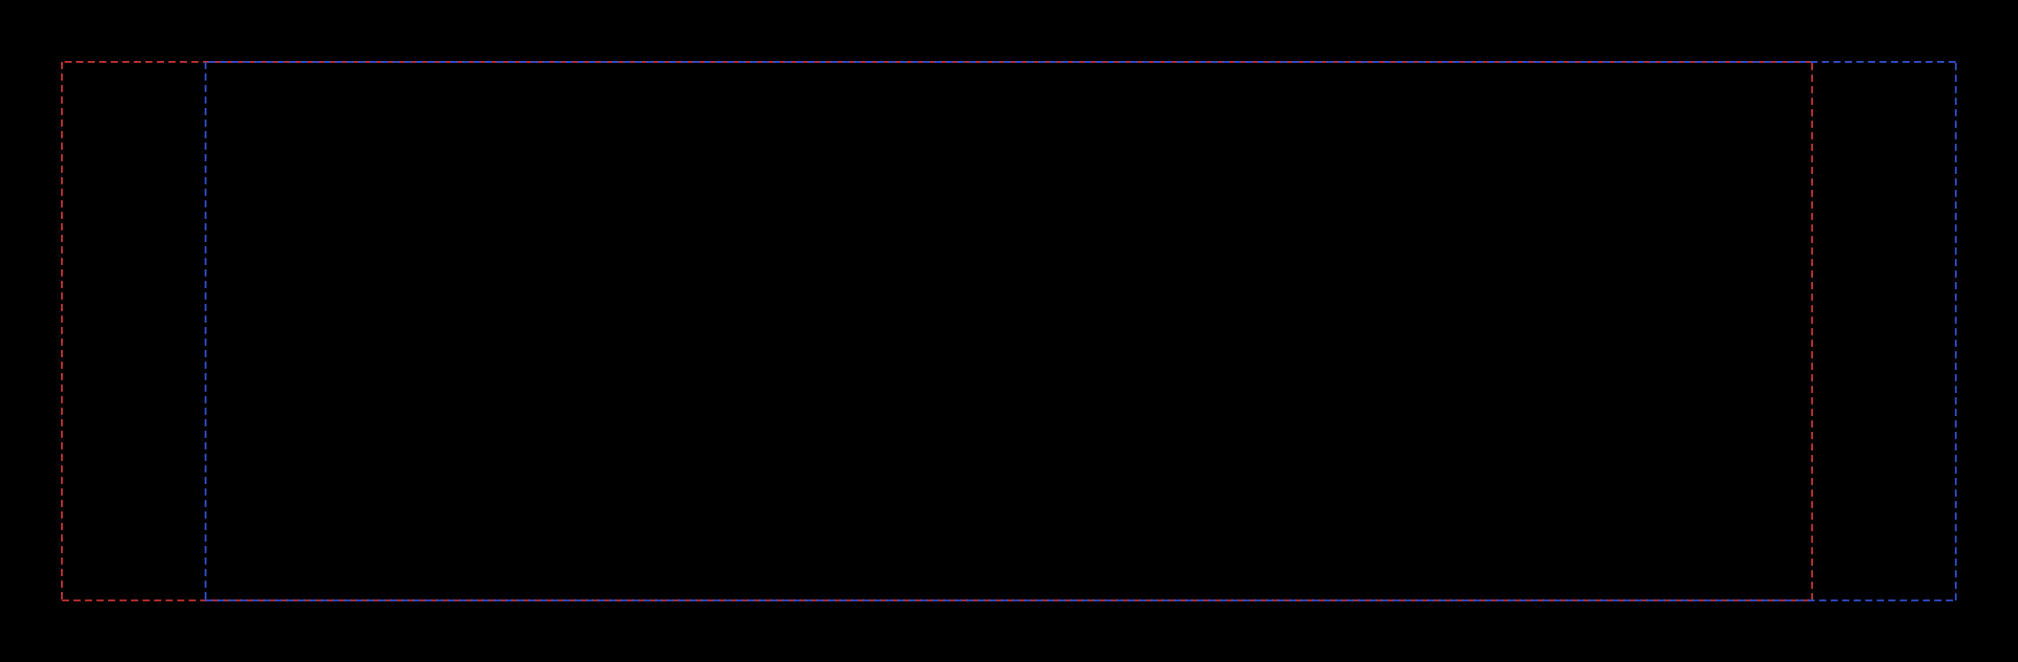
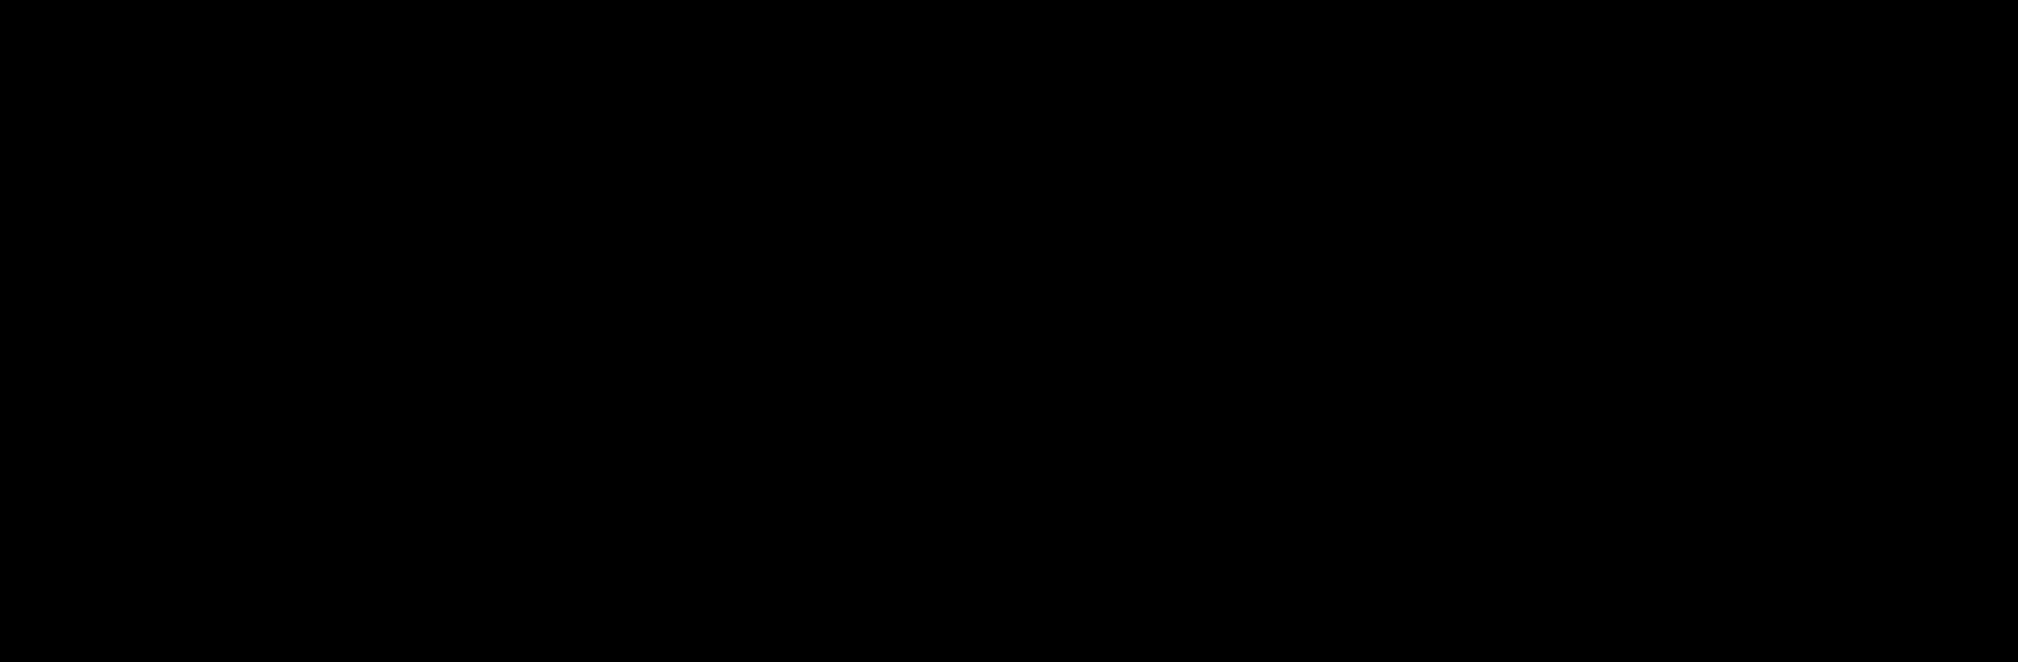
top zone outline: (1812, 61) (1812, 600) (61, 600) (61, 61) (1812, 61) -> none
bottom zone outline: (1955, 61) (1955, 600) (205, 600) (205, 61) (1955, 61) -> none

